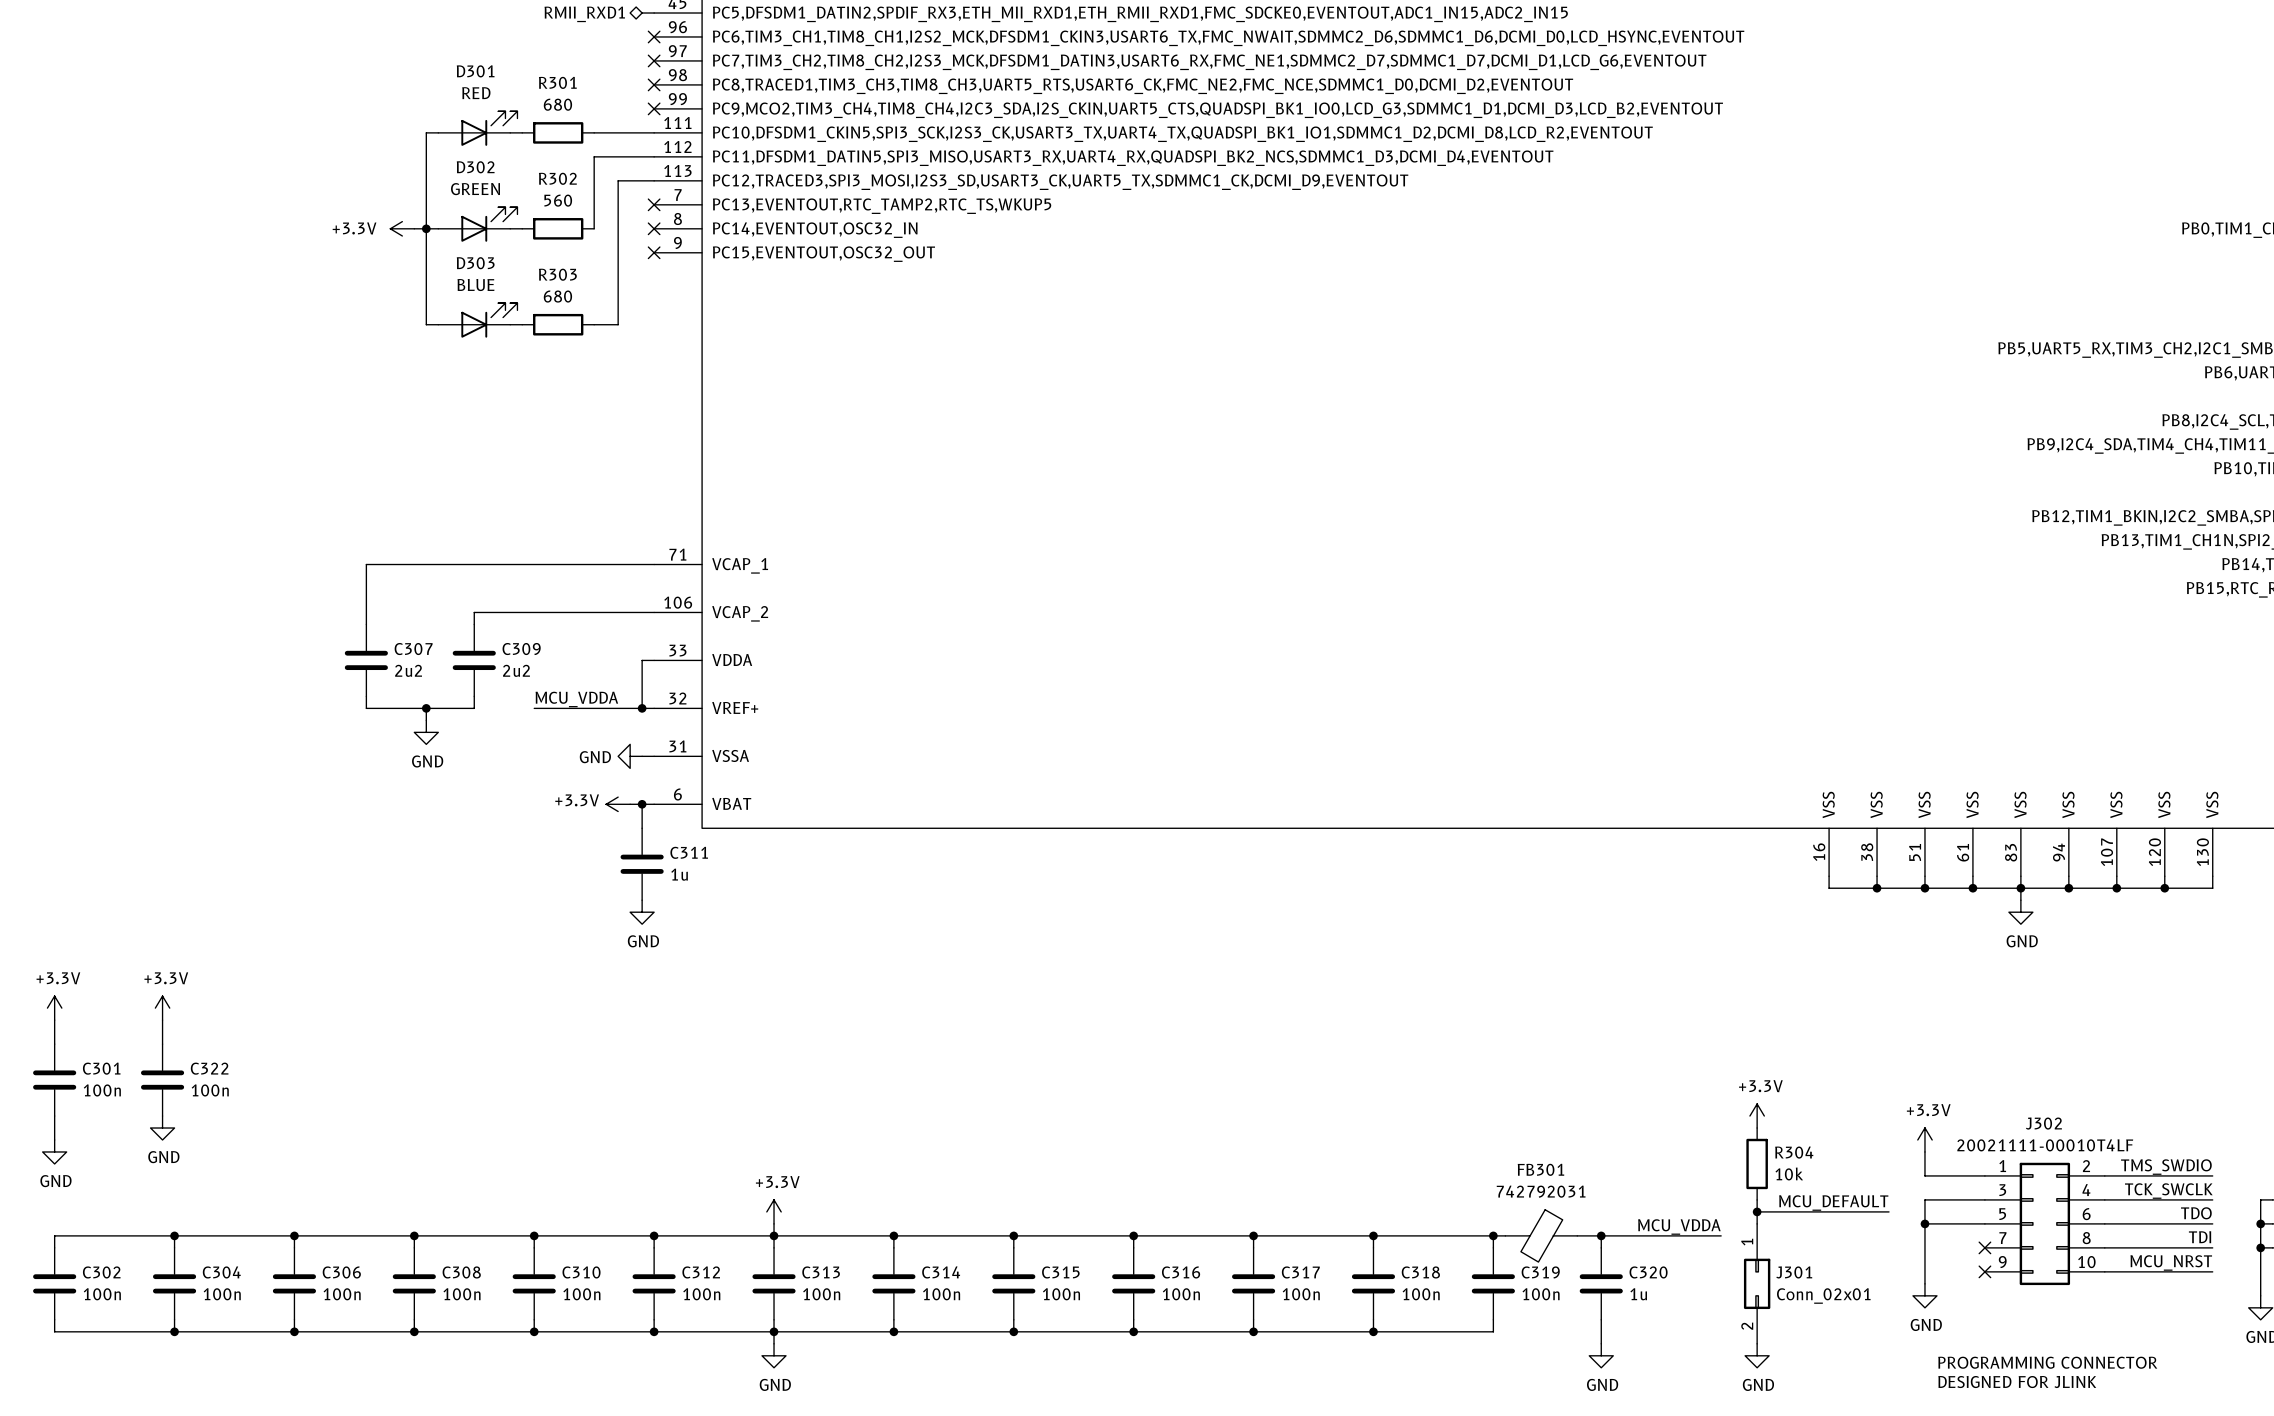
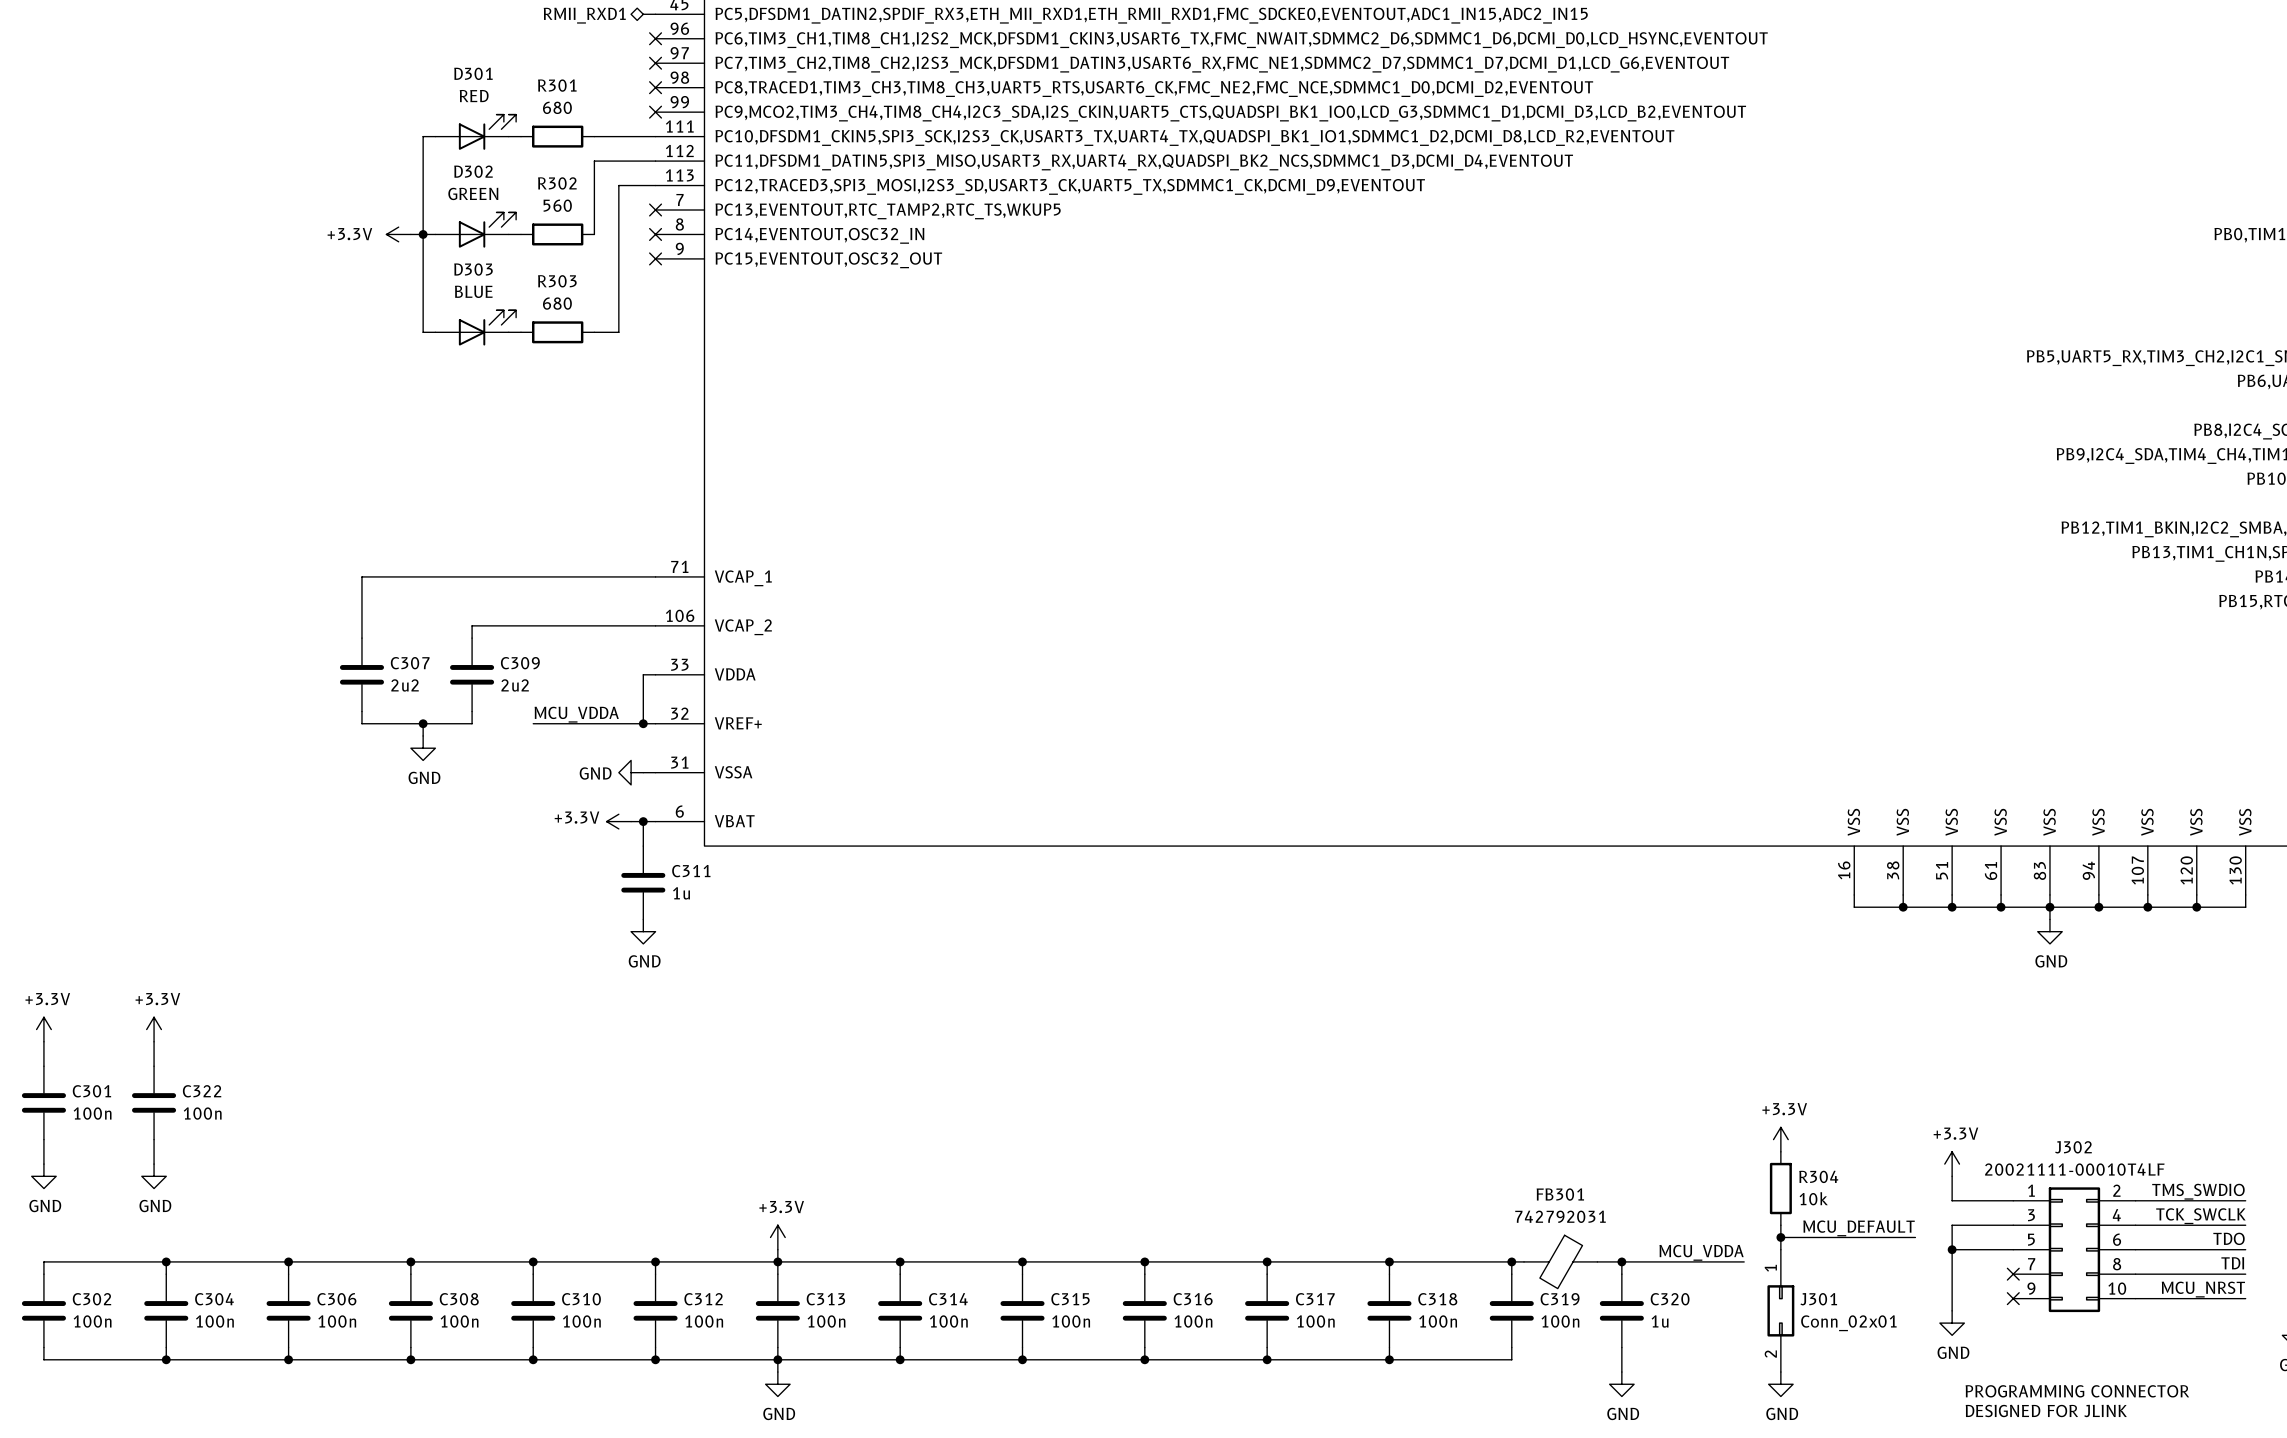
power symbol position: GND (162, 1128) -> GND (154, 1176)

